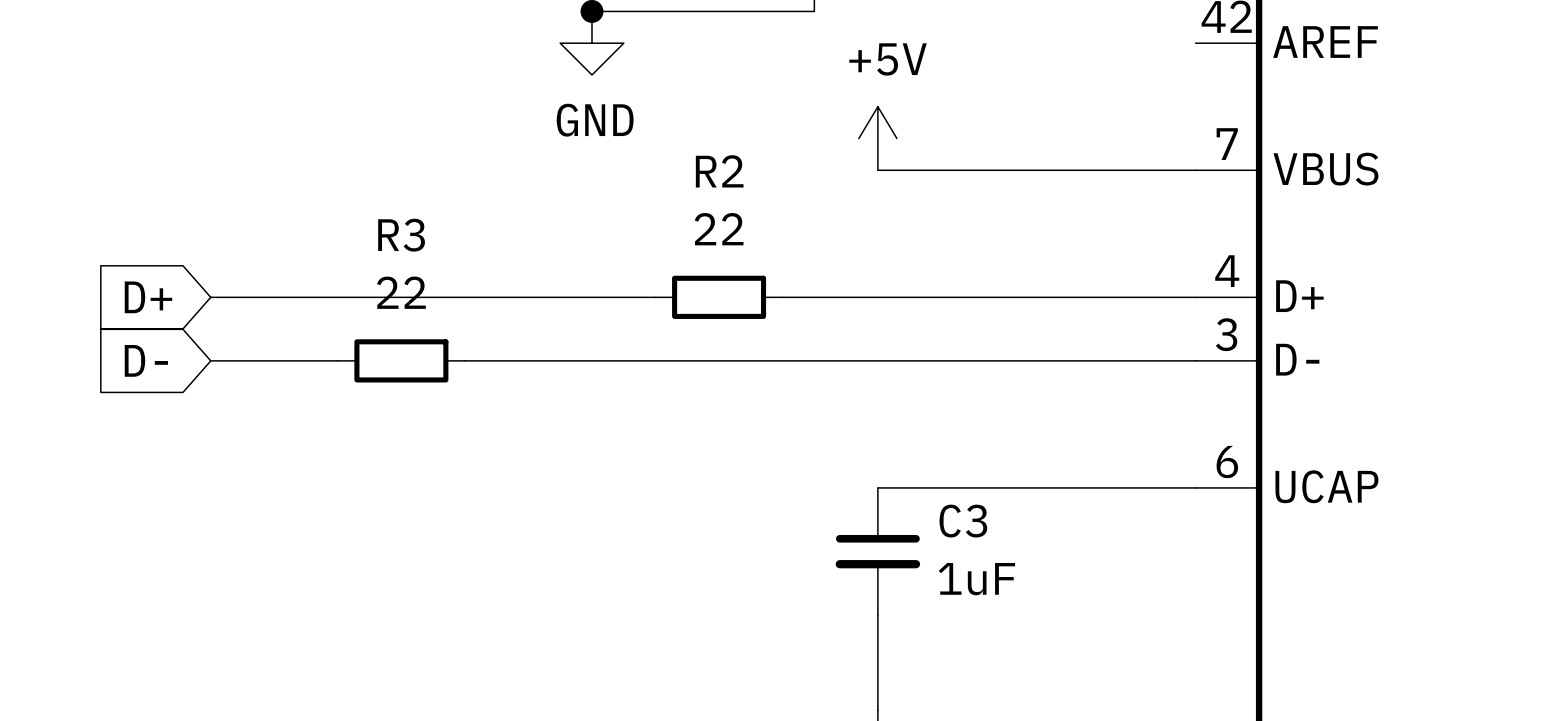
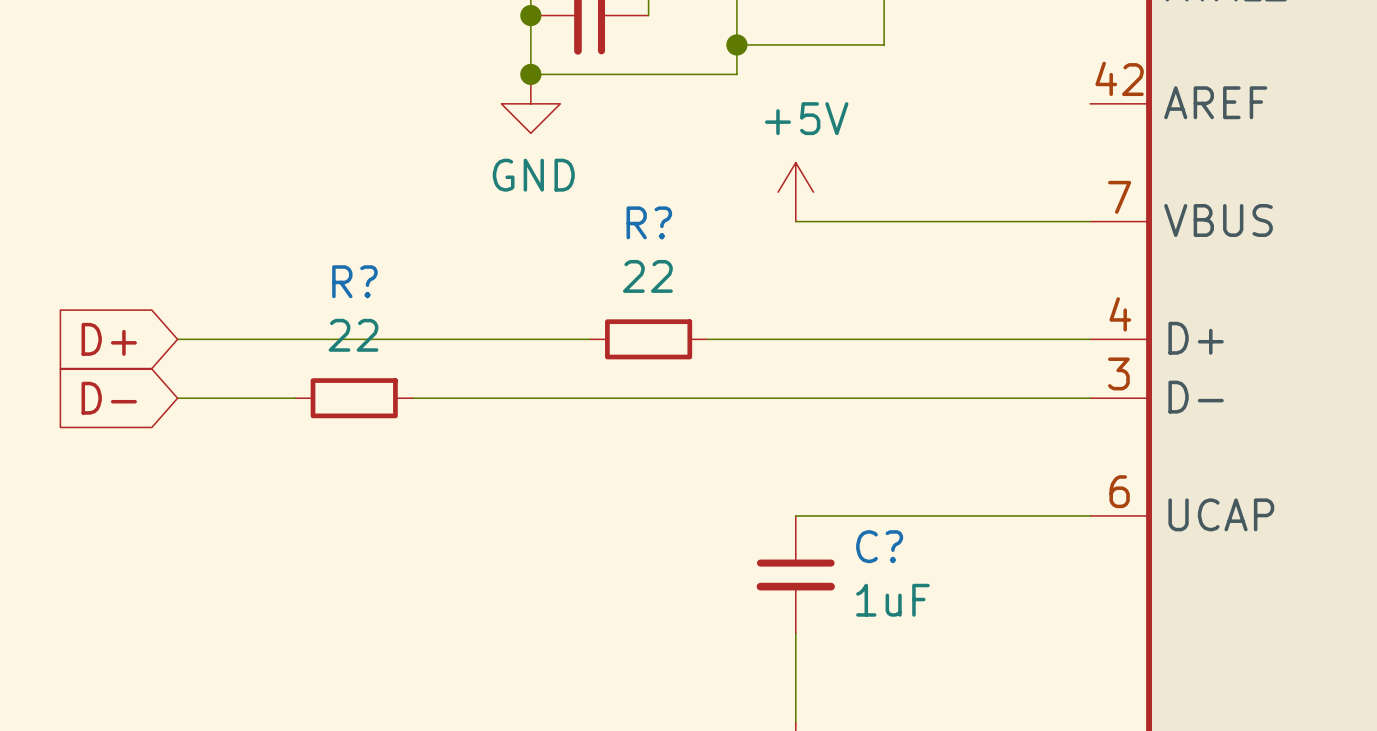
R2 name: R2 (719, 171) -> R? (649, 222)
R3 name: R3 (401, 235) -> R? (354, 281)
C3 name: C3 (963, 521) -> C? (879, 546)

